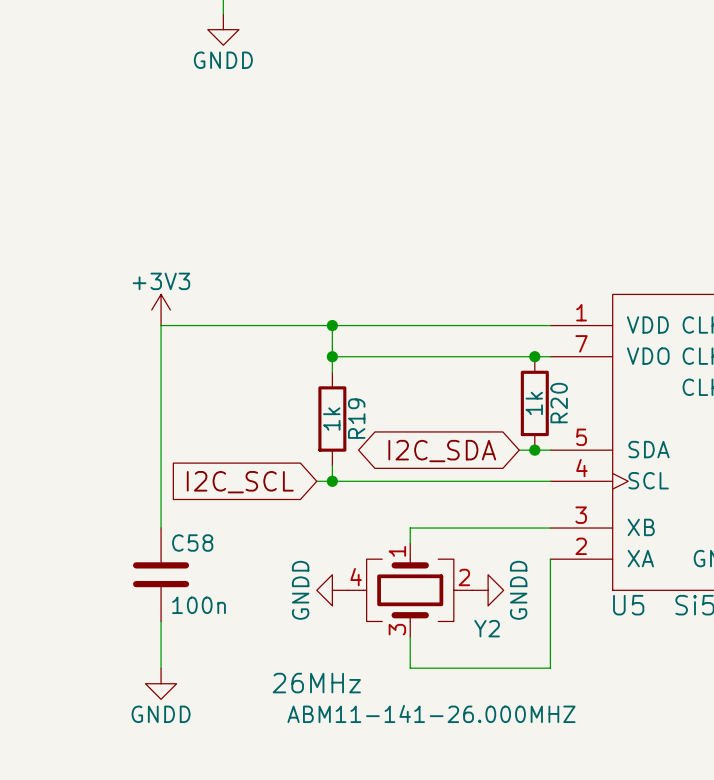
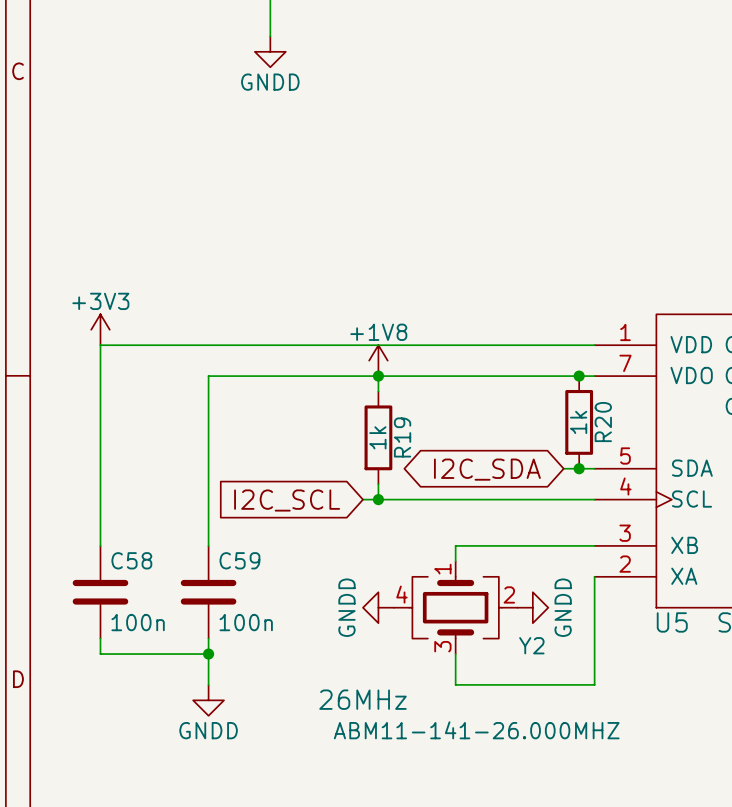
power symbol position: +3V3 (161, 309) -> +3V3 (100, 329)
wire: (161, 325) (161, 356) -> (378, 376) (208, 376)
wire: none -> (208, 345) (100, 345) (100, 545)
junction: (332, 325) -> none
power symbol: none -> +1V8 (378, 360)
C58 name: C58 (192, 543) -> C59 (239, 560)
C58: none -> 100n (100, 592)
wire: none -> (100, 638) (100, 654) (208, 654)
junction: none -> (208, 654)

